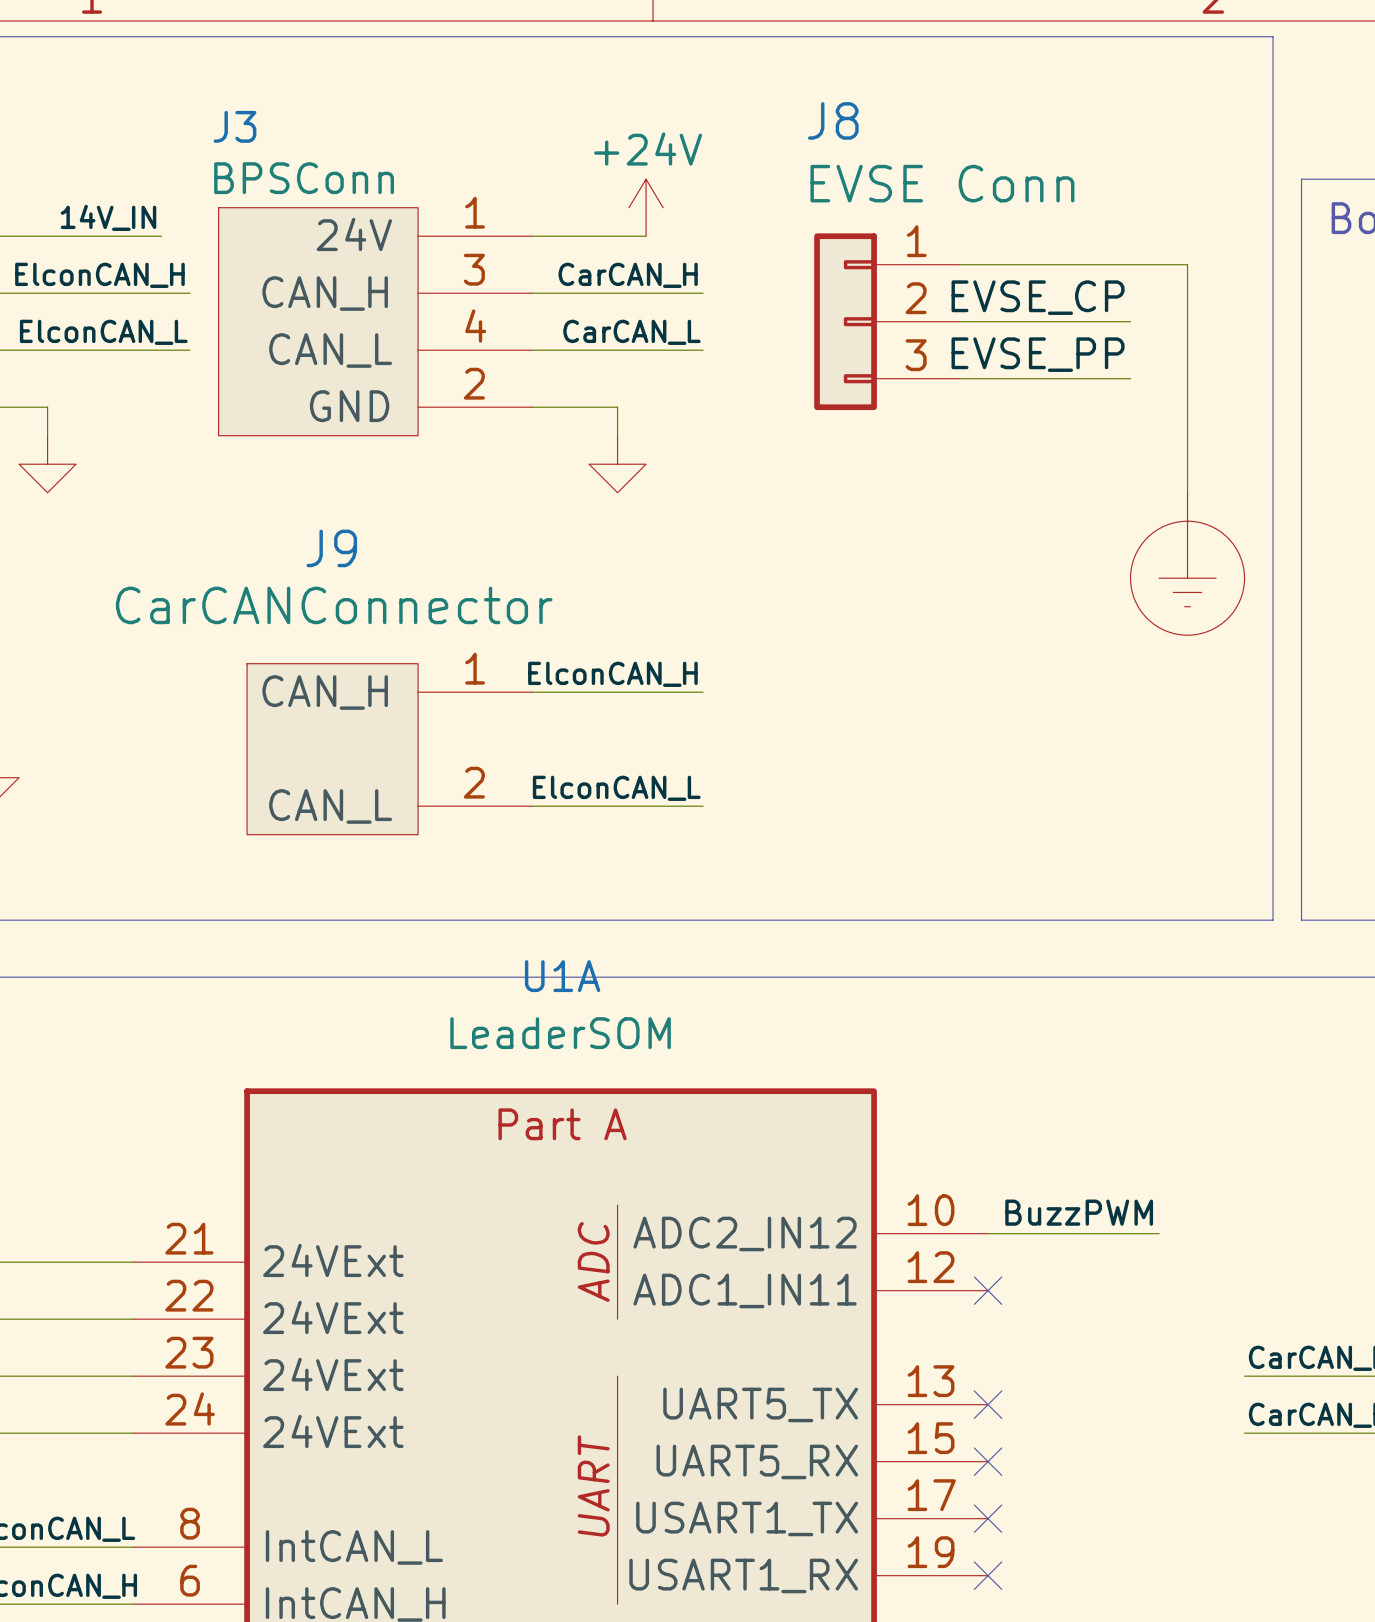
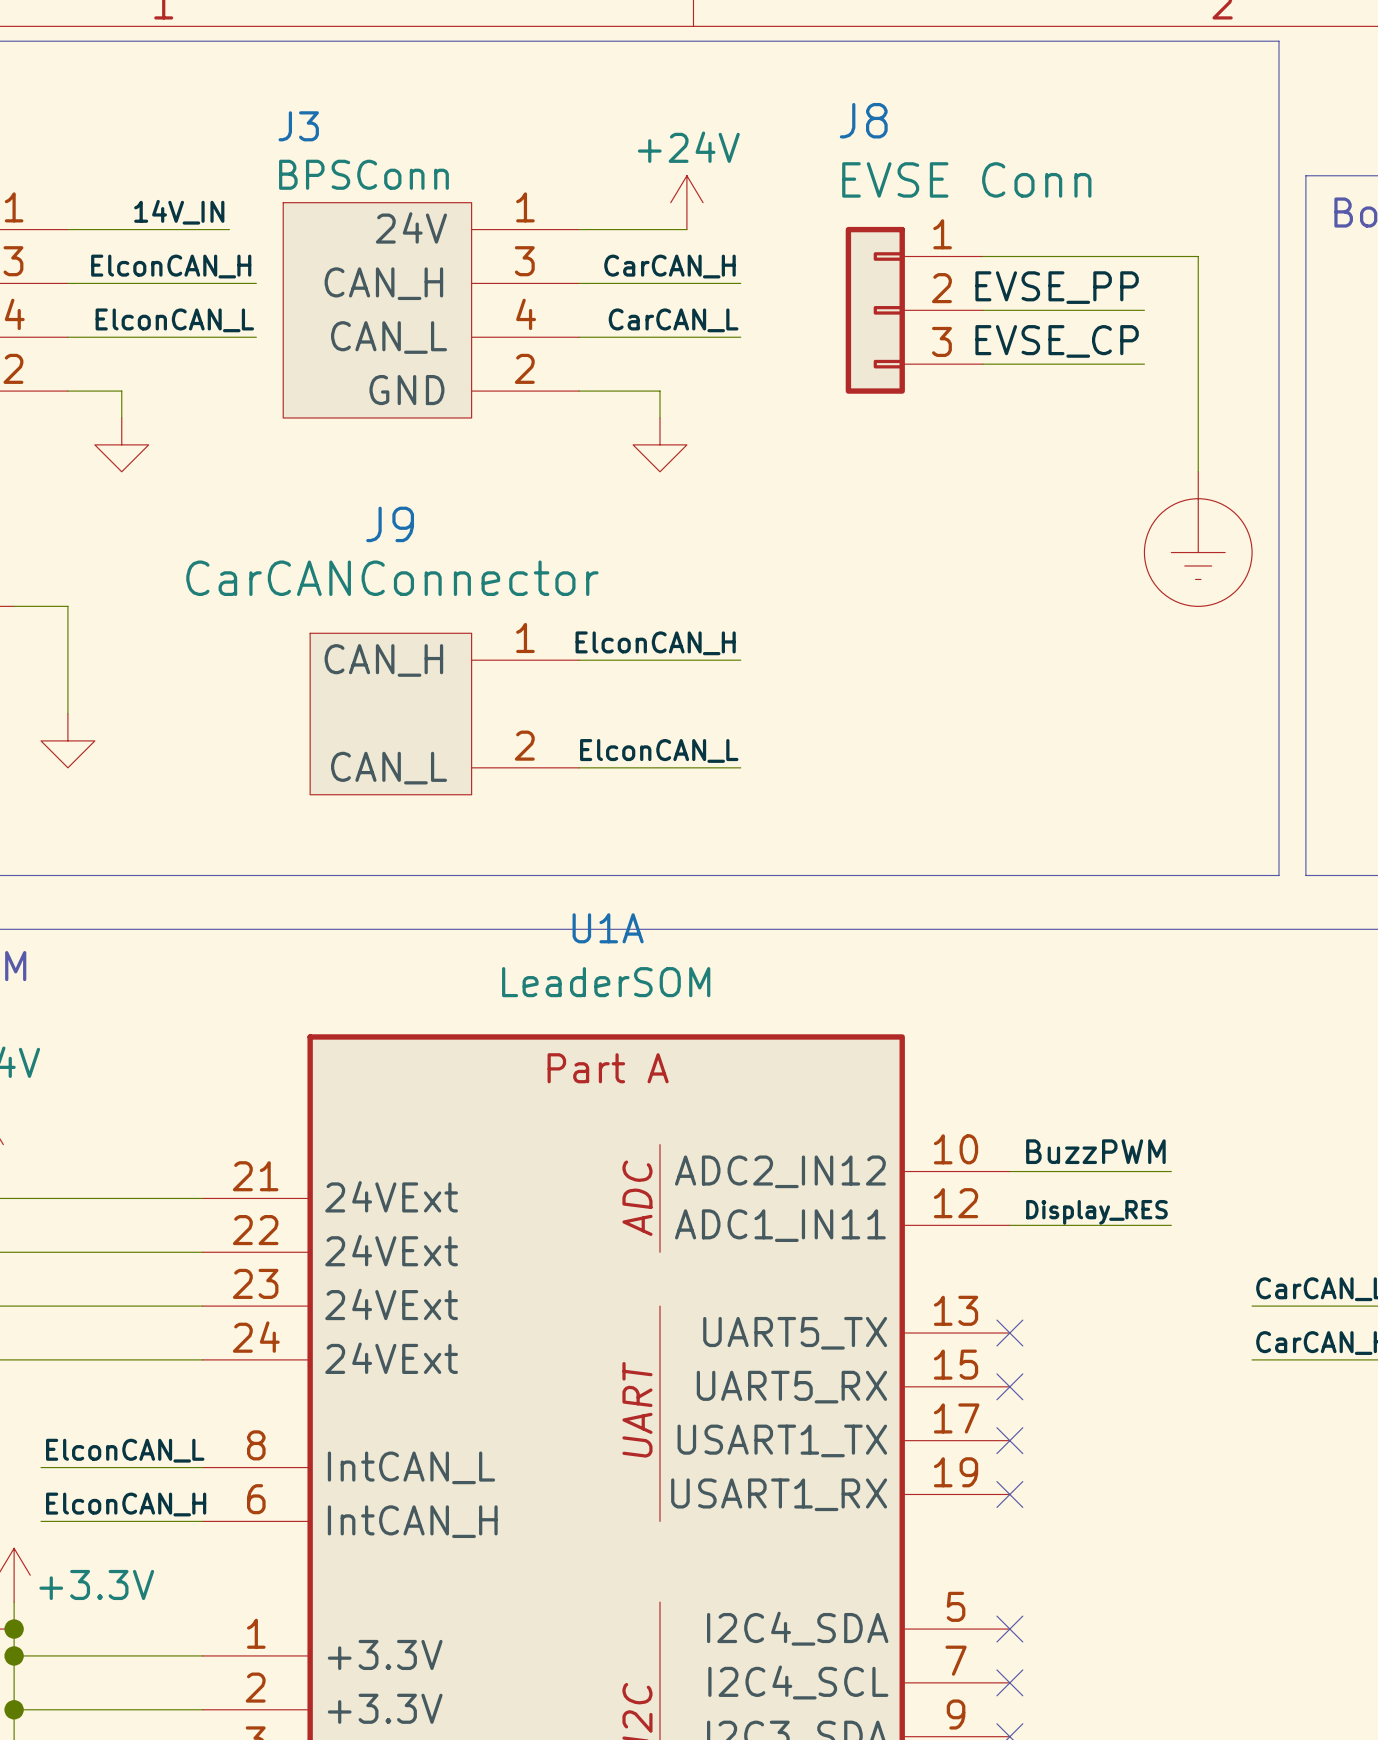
label: EVSE_CP (1038, 297) -> EVSE_PP (1057, 287)
label: EVSE_PP (1038, 354) -> EVSE_CP (1057, 341)
label: none -> Display_RES (1096, 1212)
wire: none -> (1009, 1225) (1171, 1225)
no-connect mark: (988, 1290) -> none

